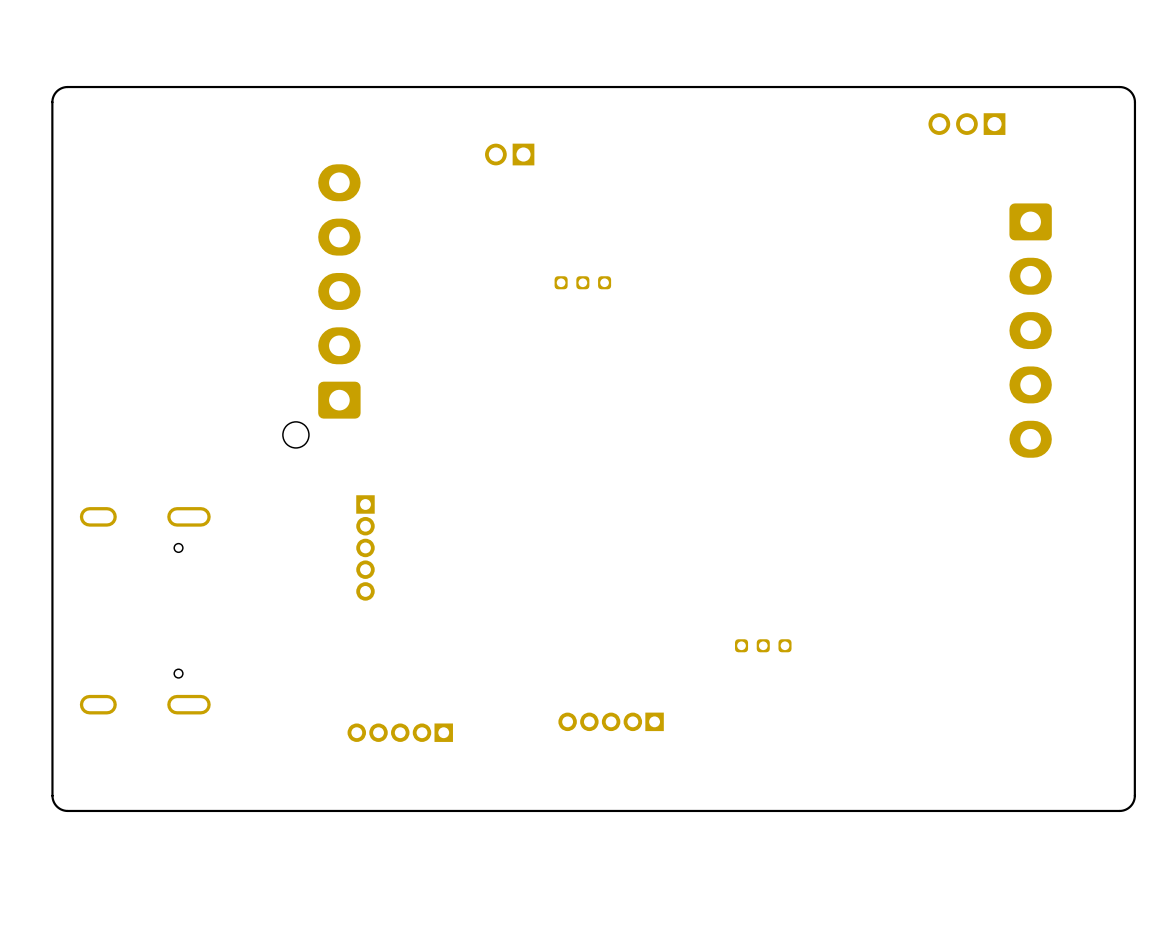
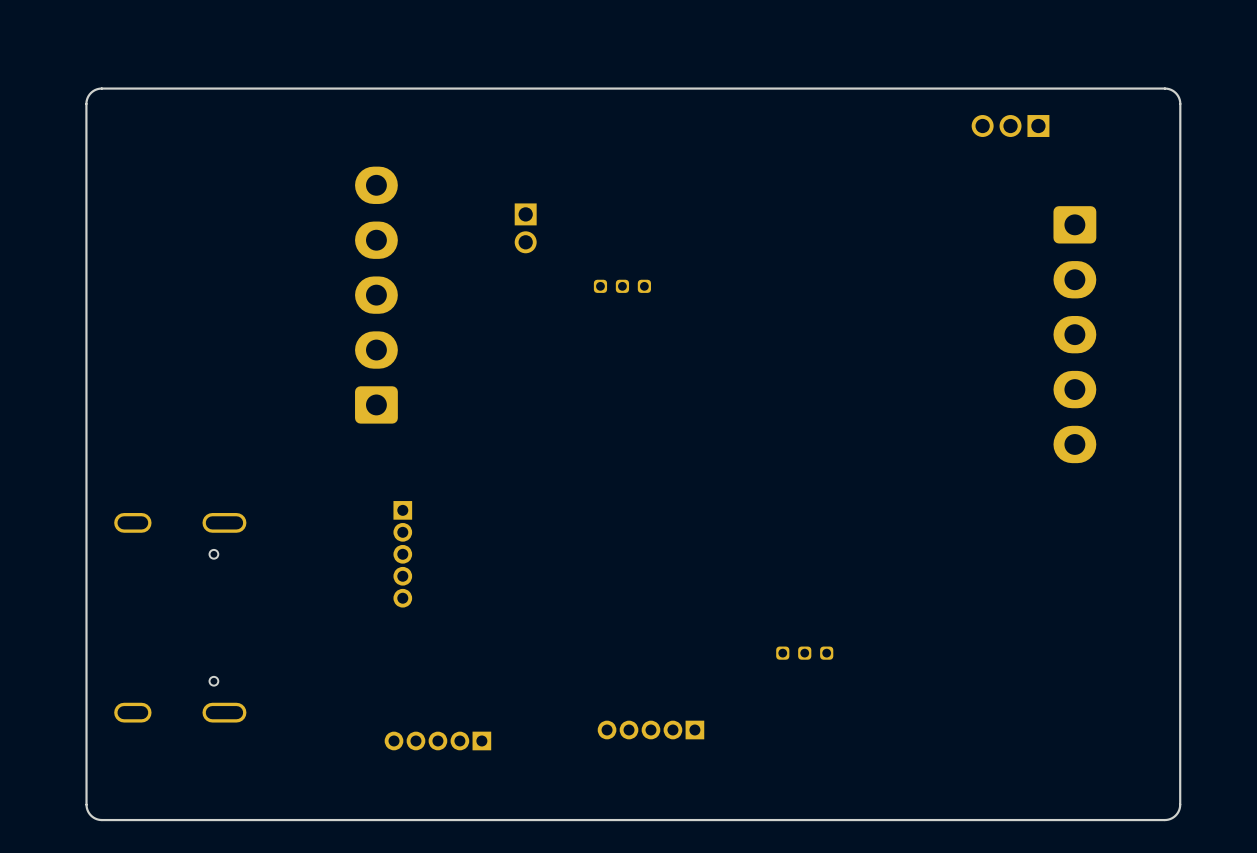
part rotation: 0° (509, 154) -> 90° counterclockwise (525, 228)
part position: (509, 154) -> (525, 228)
part: (321, 306) -> none

